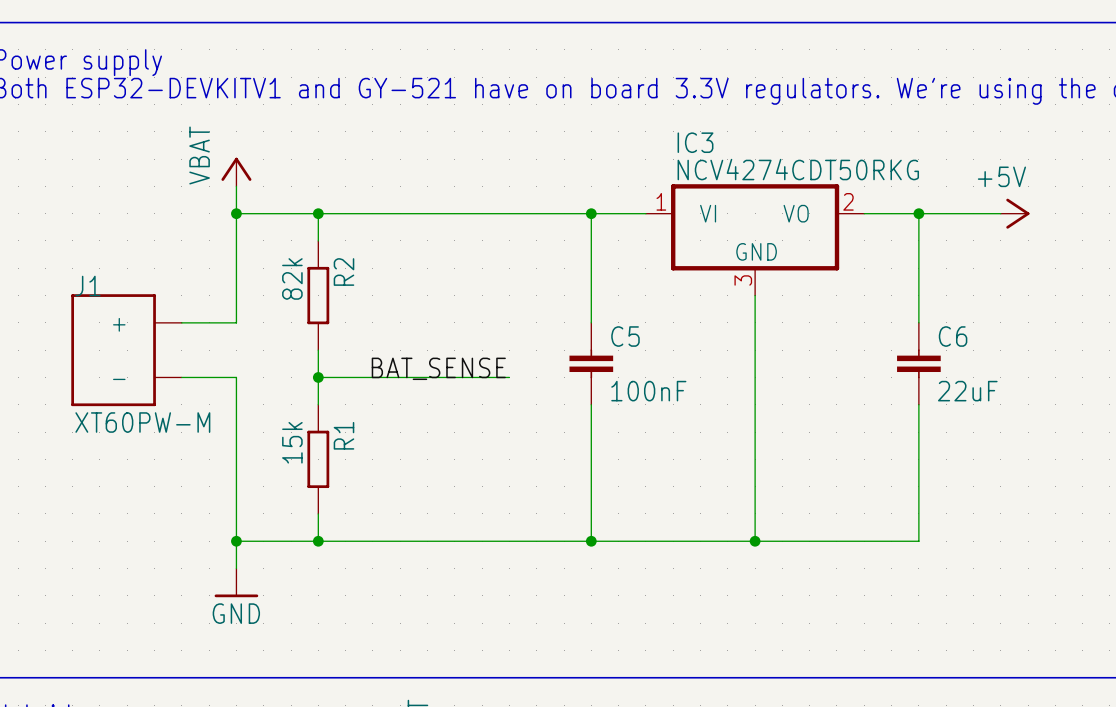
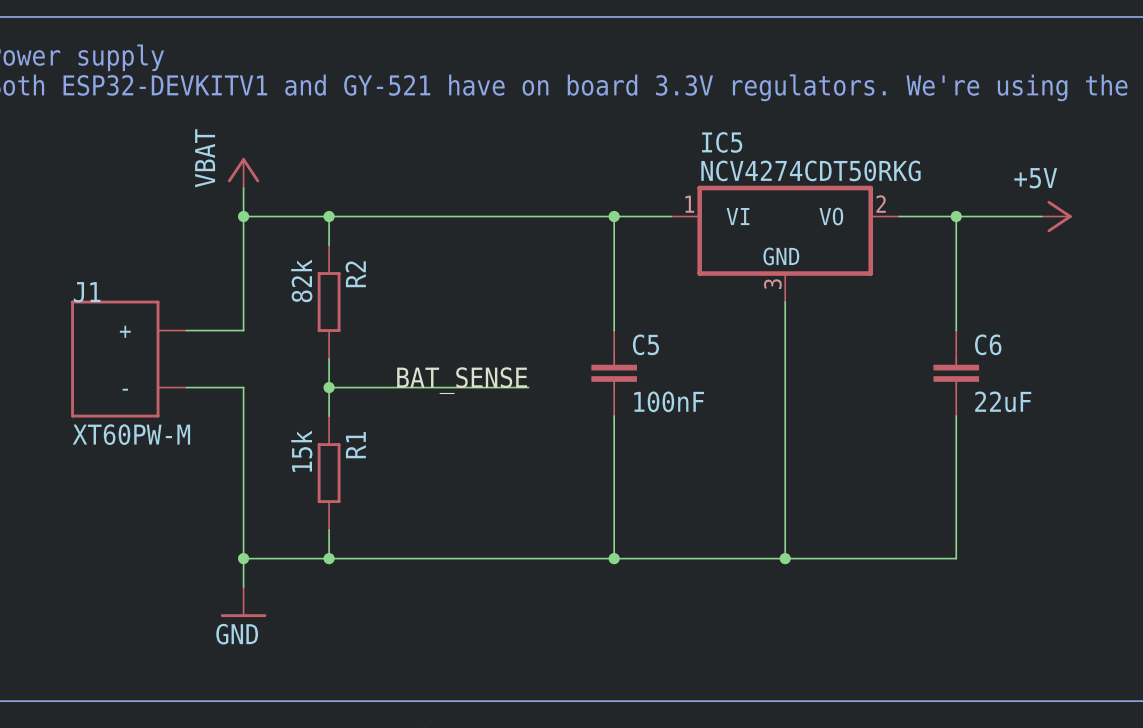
IC3 name: IC3 (695, 142) -> IC5 (722, 142)

